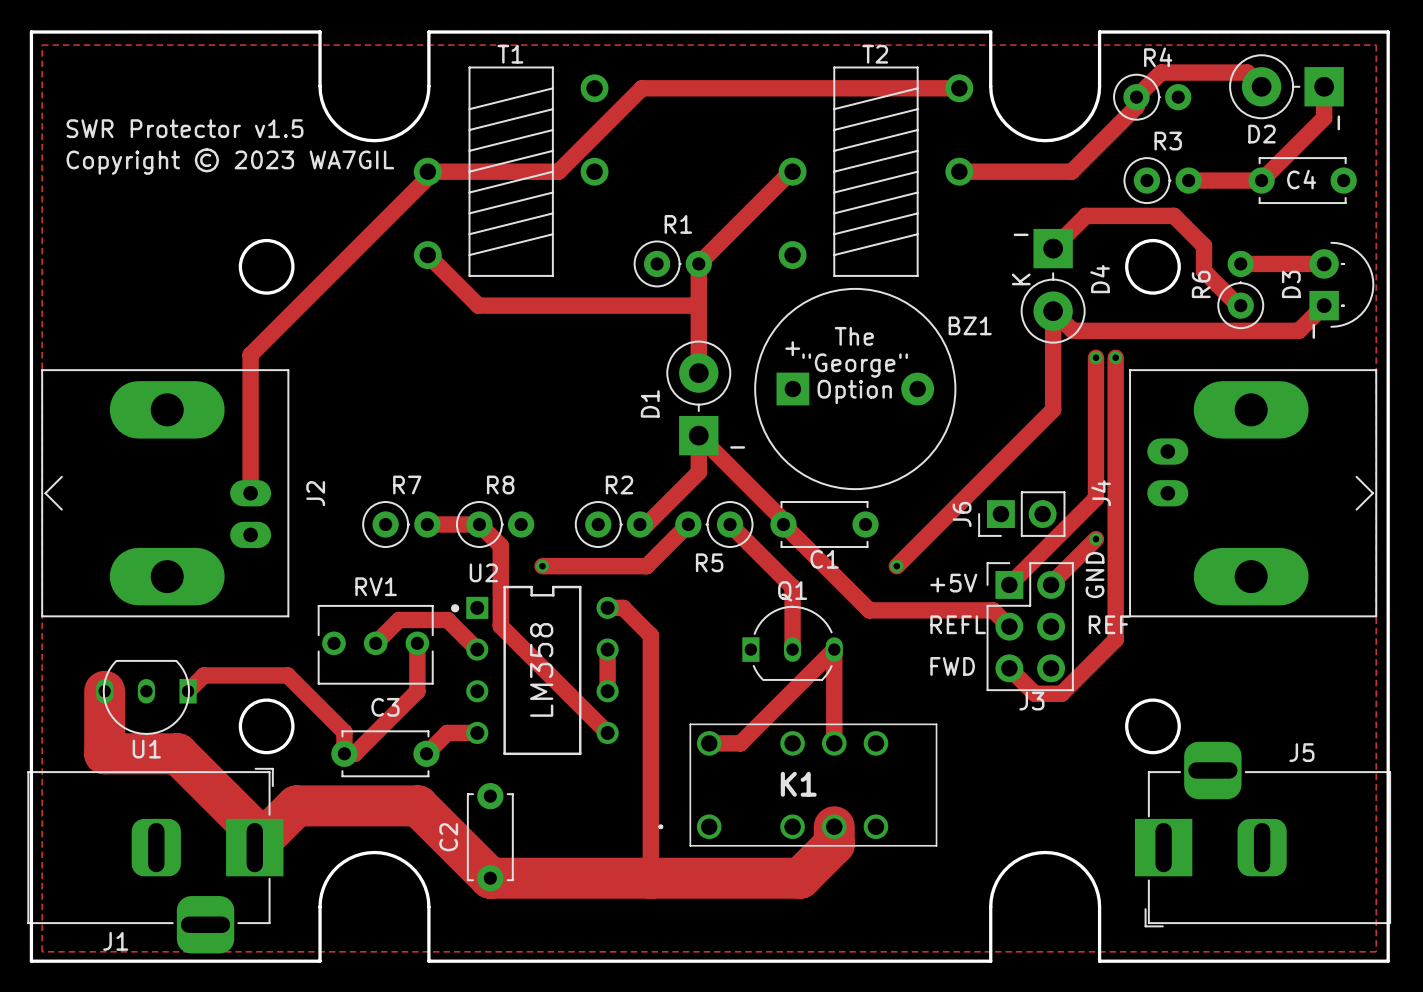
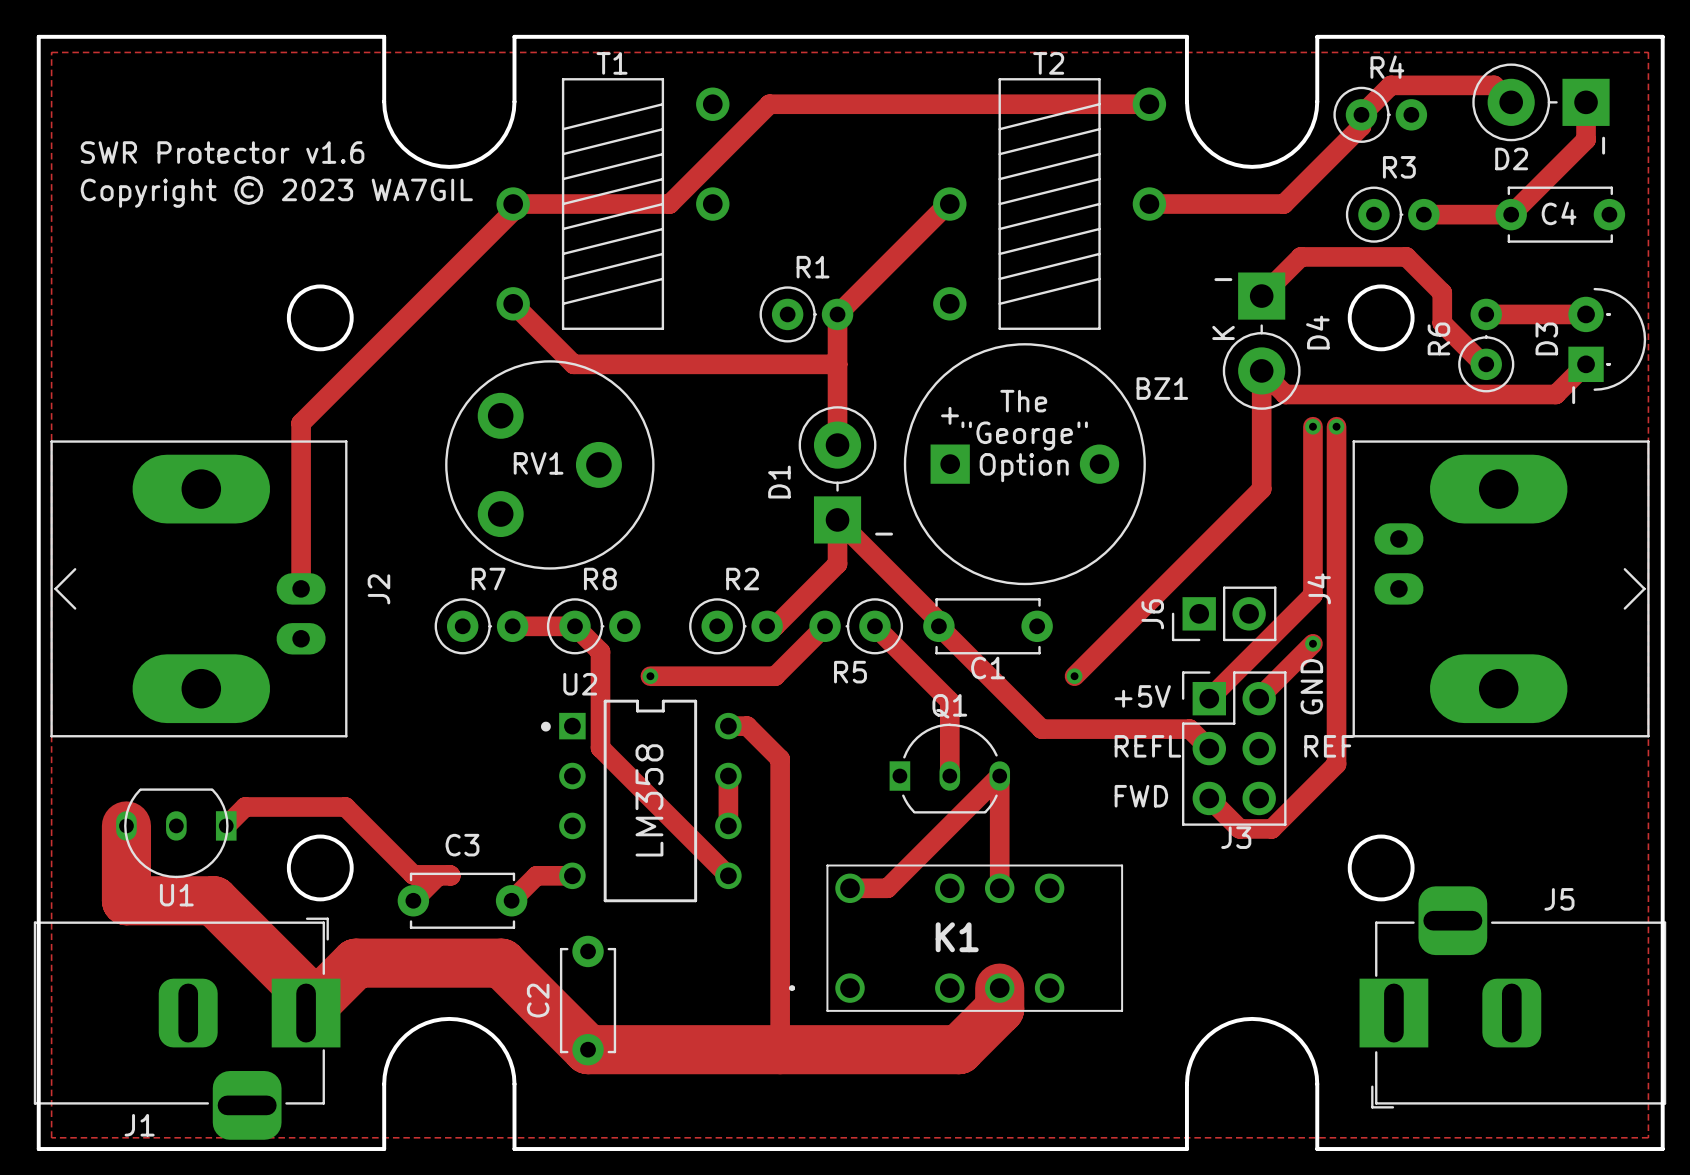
text: SWR Protector v1.5 (185, 128) -> SWR Protector v1.6 (222, 152)
RV1 name position: RV1 (376, 586) -> RV1 (538, 463)
RV1 footprint: [317, 604, 434, 685] -> [445, 360, 655, 570]
track: (375, 643) (398, 620) (447, 620) (477, 649) -> none
track: (417, 643) (417, 691) (354, 753) (344, 753) (344, 732) -> (413, 900) (438, 875) (450, 875) (413, 874)

